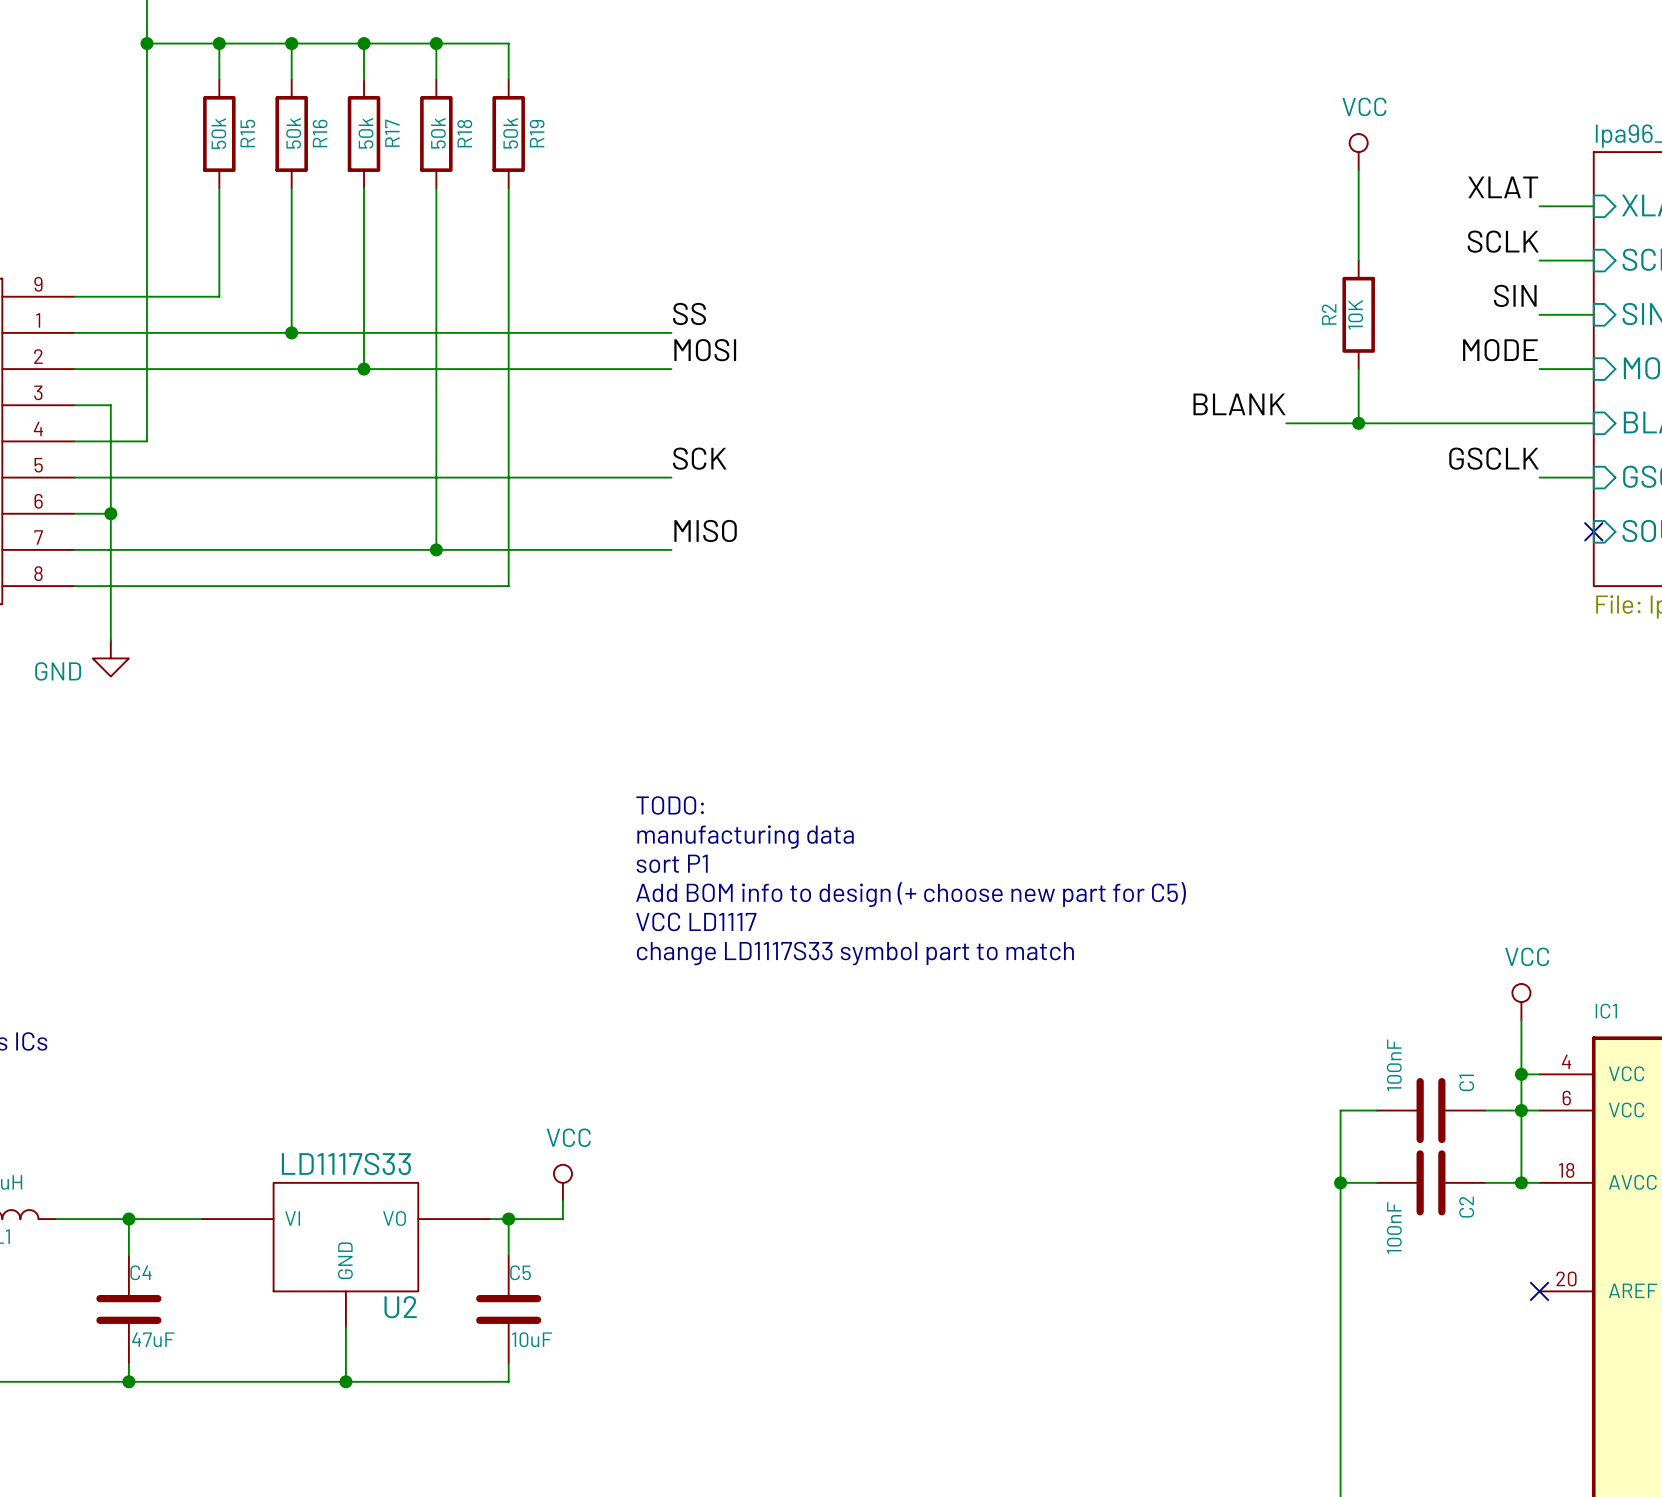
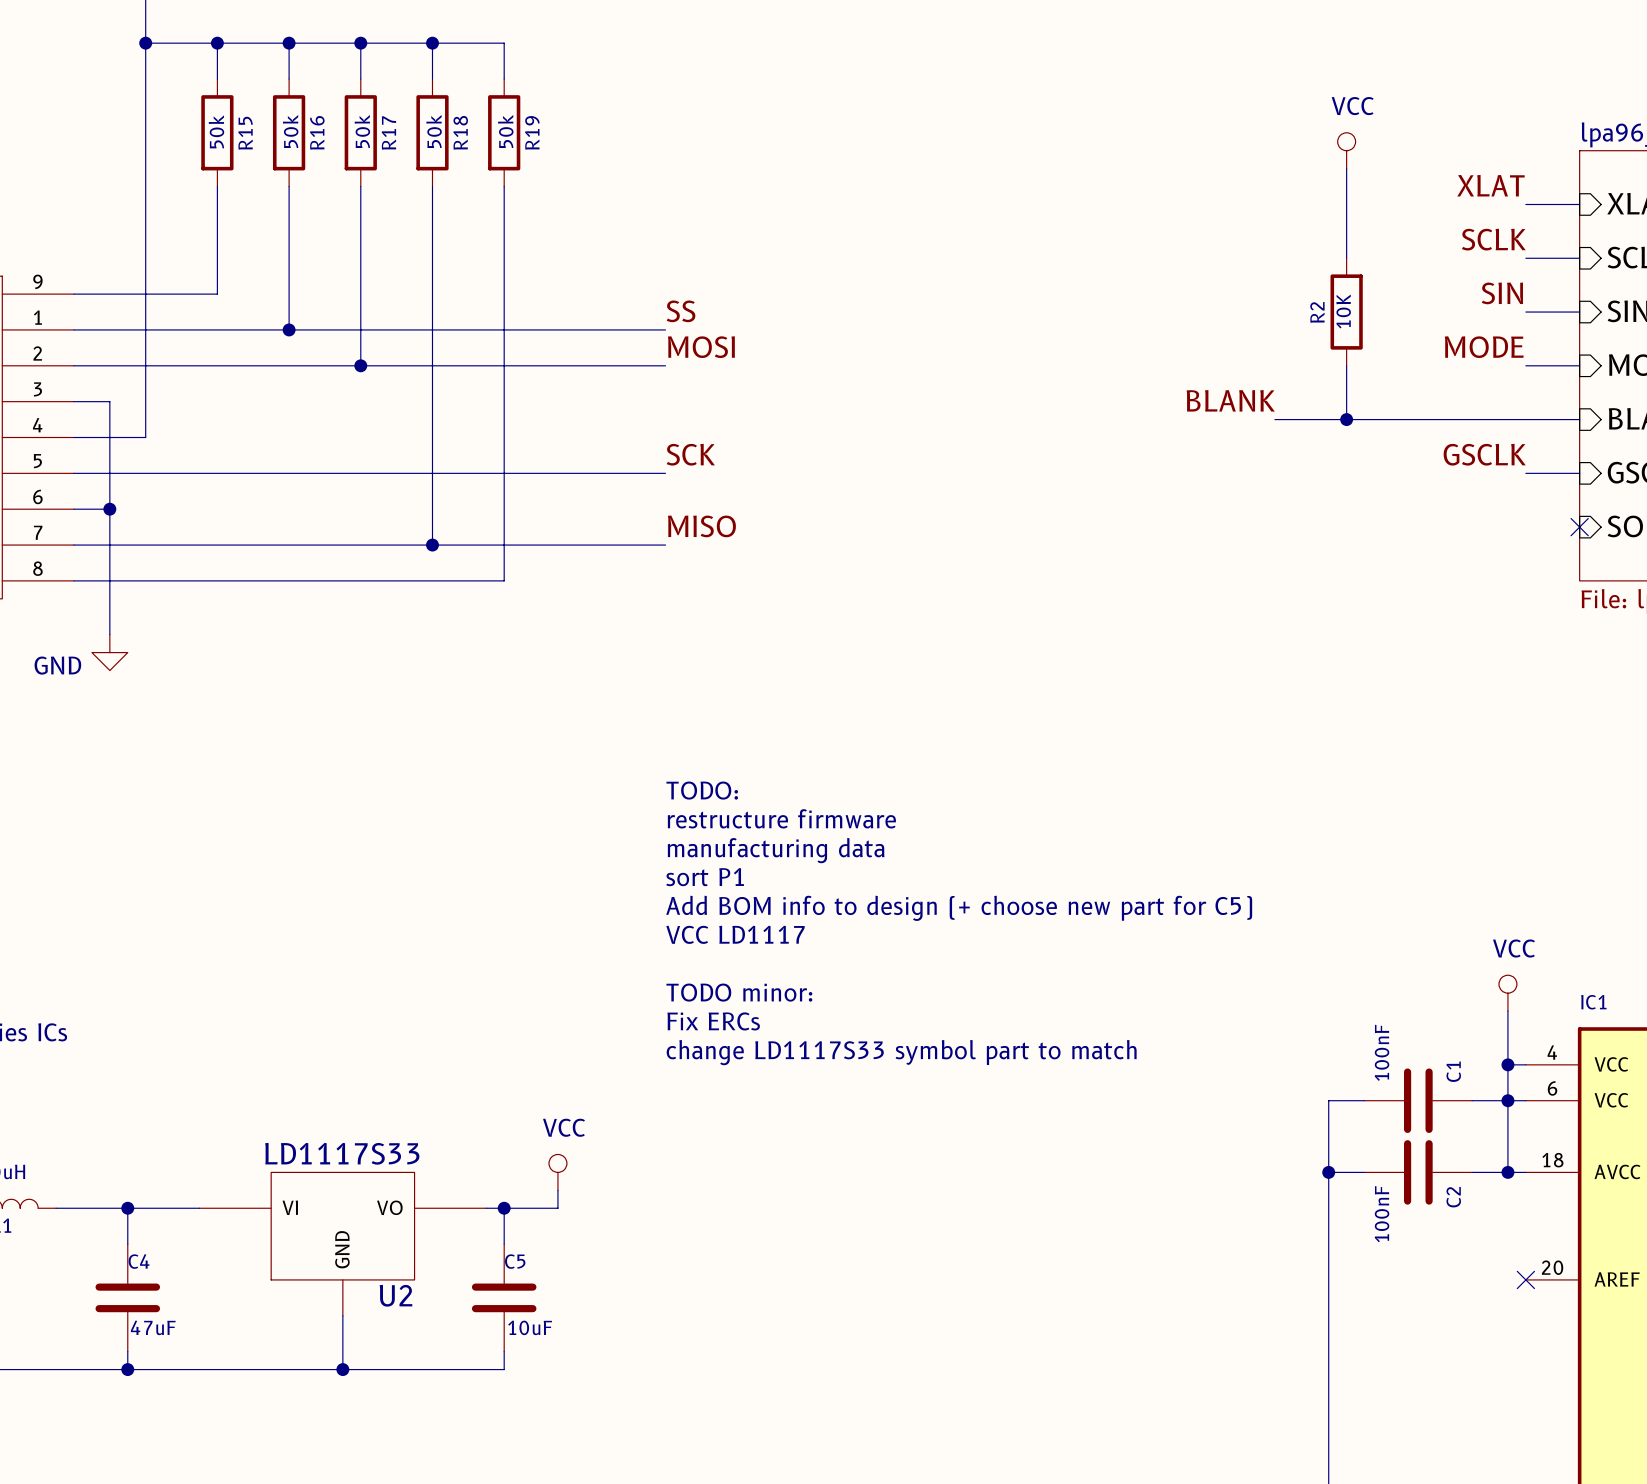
text position: TODO: (670, 805) -> TODO: (702, 790)
text: none -> restructure firmware (781, 818)
text position: manufacturing data (745, 837) -> manufacturing data (776, 850)
text position: sort P1 (672, 863) -> sort P1 (705, 877)
text position: Add BOM info to design (+ choose new part for C5) (911, 894) -> Add BOM info to design (+ choose new part for C5) (959, 908)
text position: VCC LD1117 (696, 921) -> VCC LD1117 (735, 934)
text position: change LD1117S33 symbol part to match (855, 953) -> change LD1117S33 symbol part to match (901, 1052)
text: none -> TODO minor: (739, 992)
text: none -> Fix ERCs (713, 1021)

